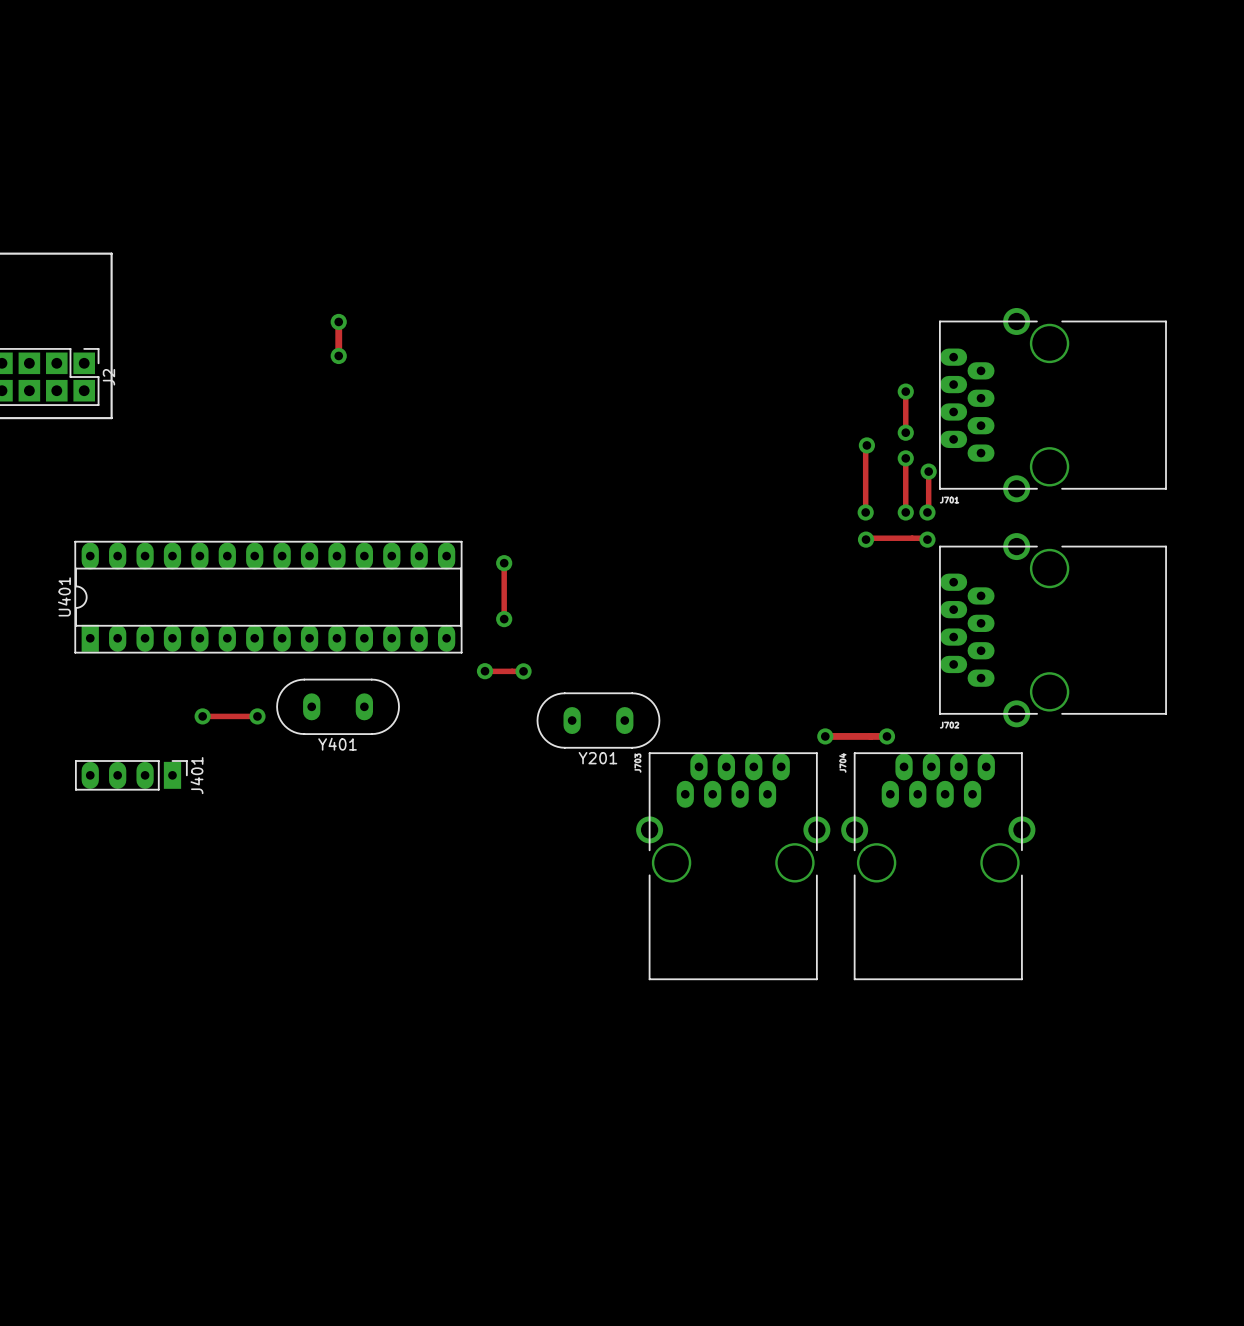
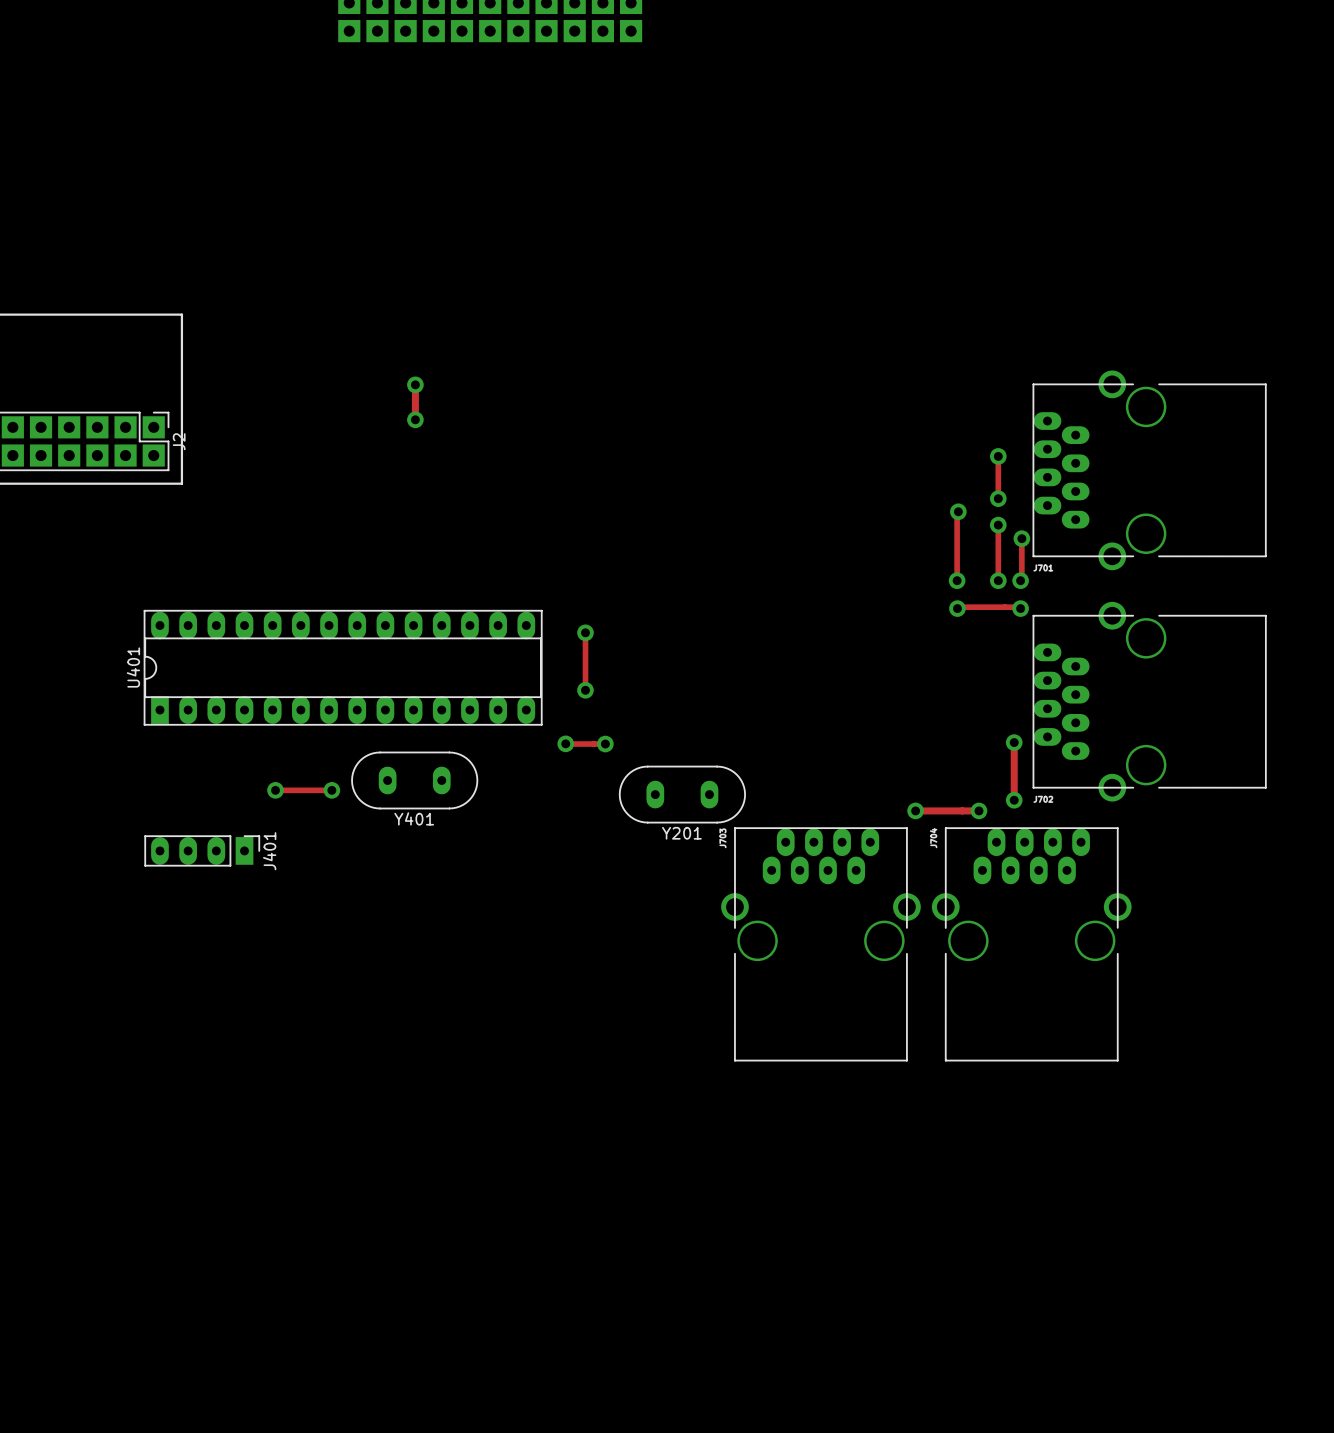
track: none -> (1014, 742) (1014, 800)
via: none -> (1014, 742)
via: none -> (1014, 800)

